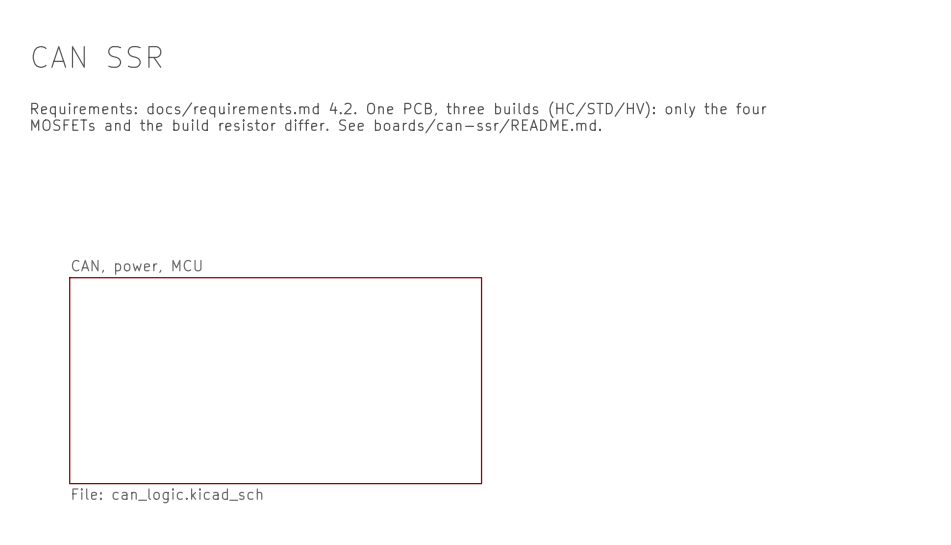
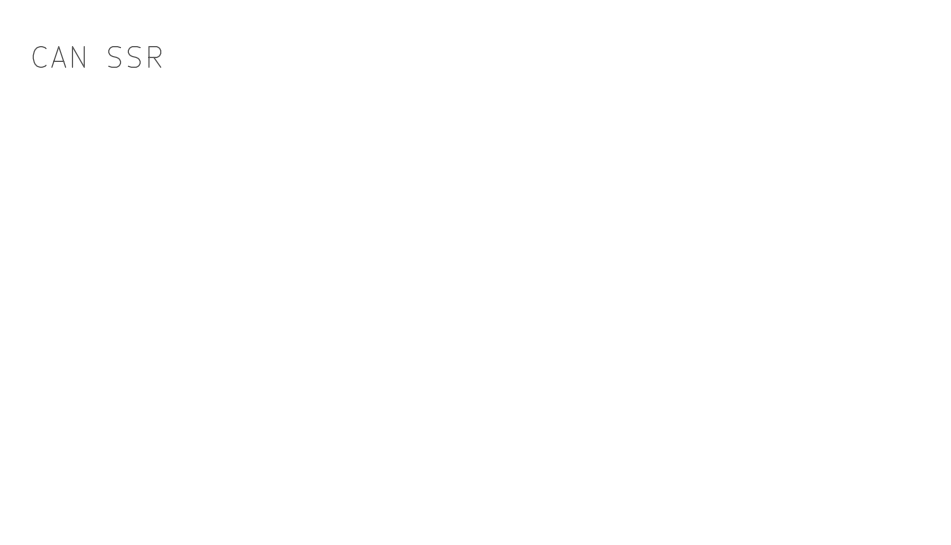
text: Requirements: docs/requirements.md 4.2. One PCB, three builds (HC/STD/HV): only the four (398, 109) -> none
text: MOSFETs and the build resistor differ. See boards/can-ssr/README.md. (316, 126) -> none
sheet CAN, power, MCU: File: can_logic.kicad_sch (275, 380) -> none

